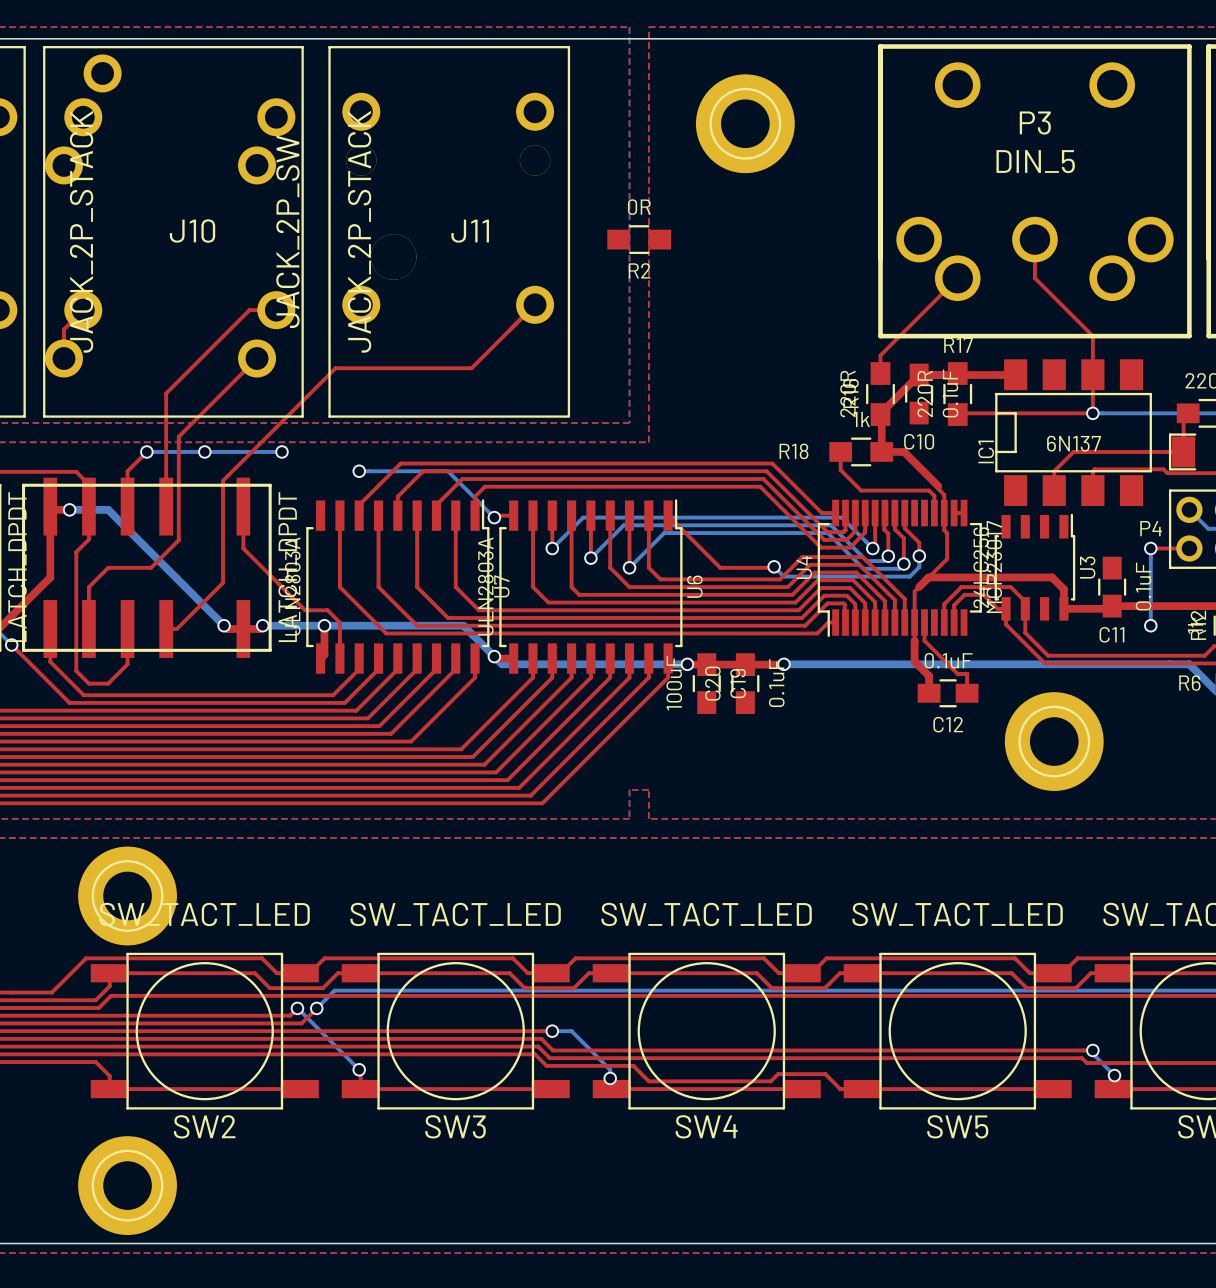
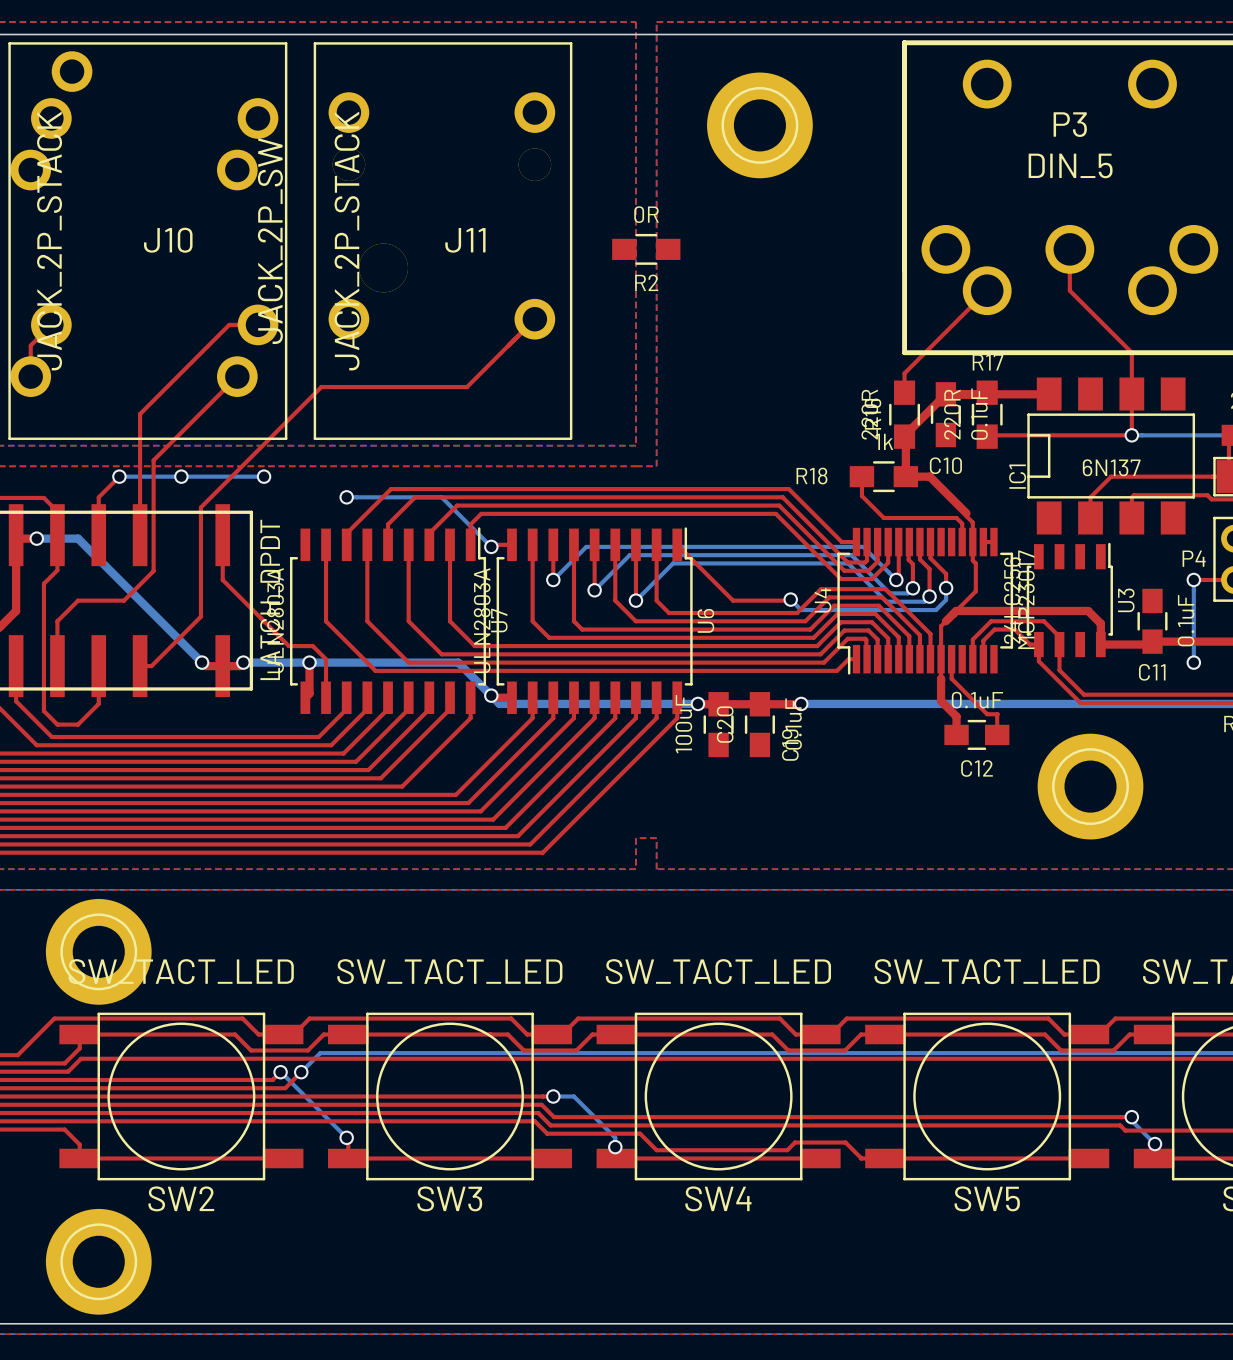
C19 name position: C19 (738, 683) -> C19 (790, 745)

